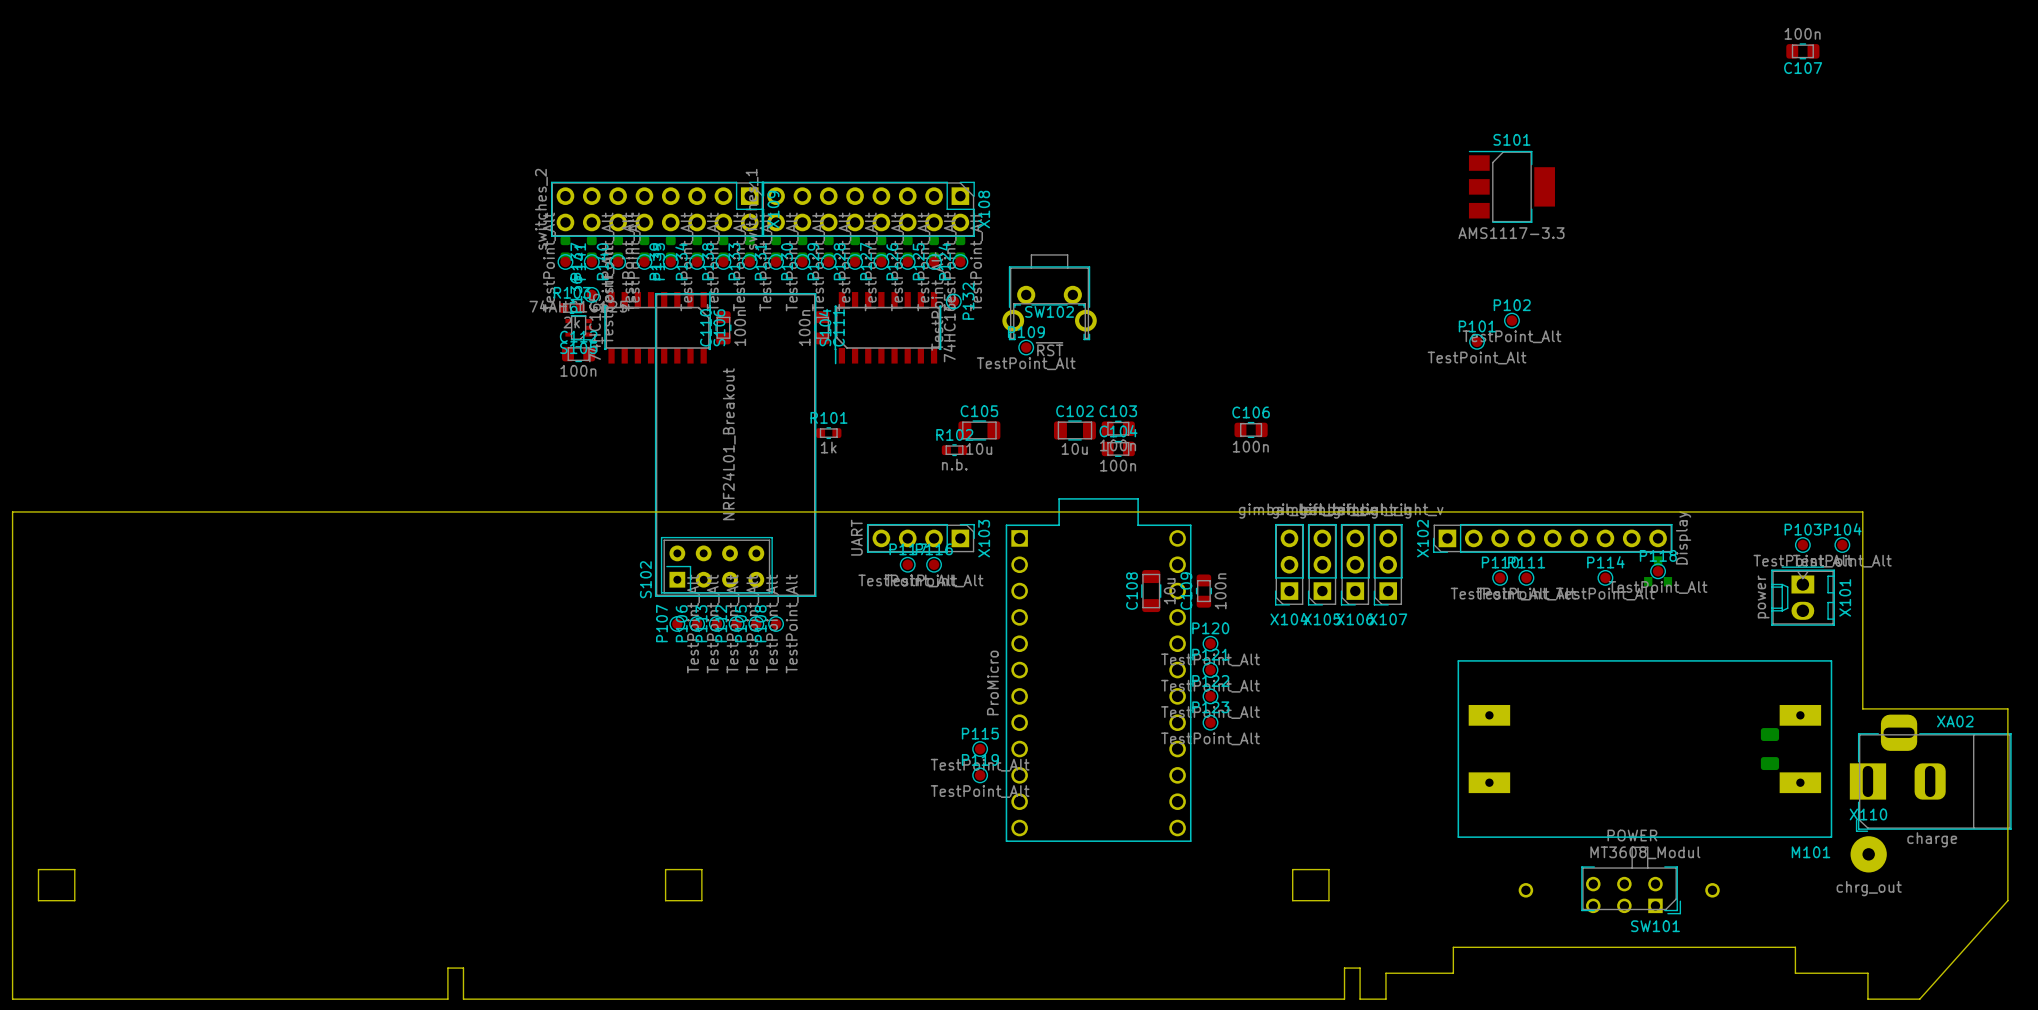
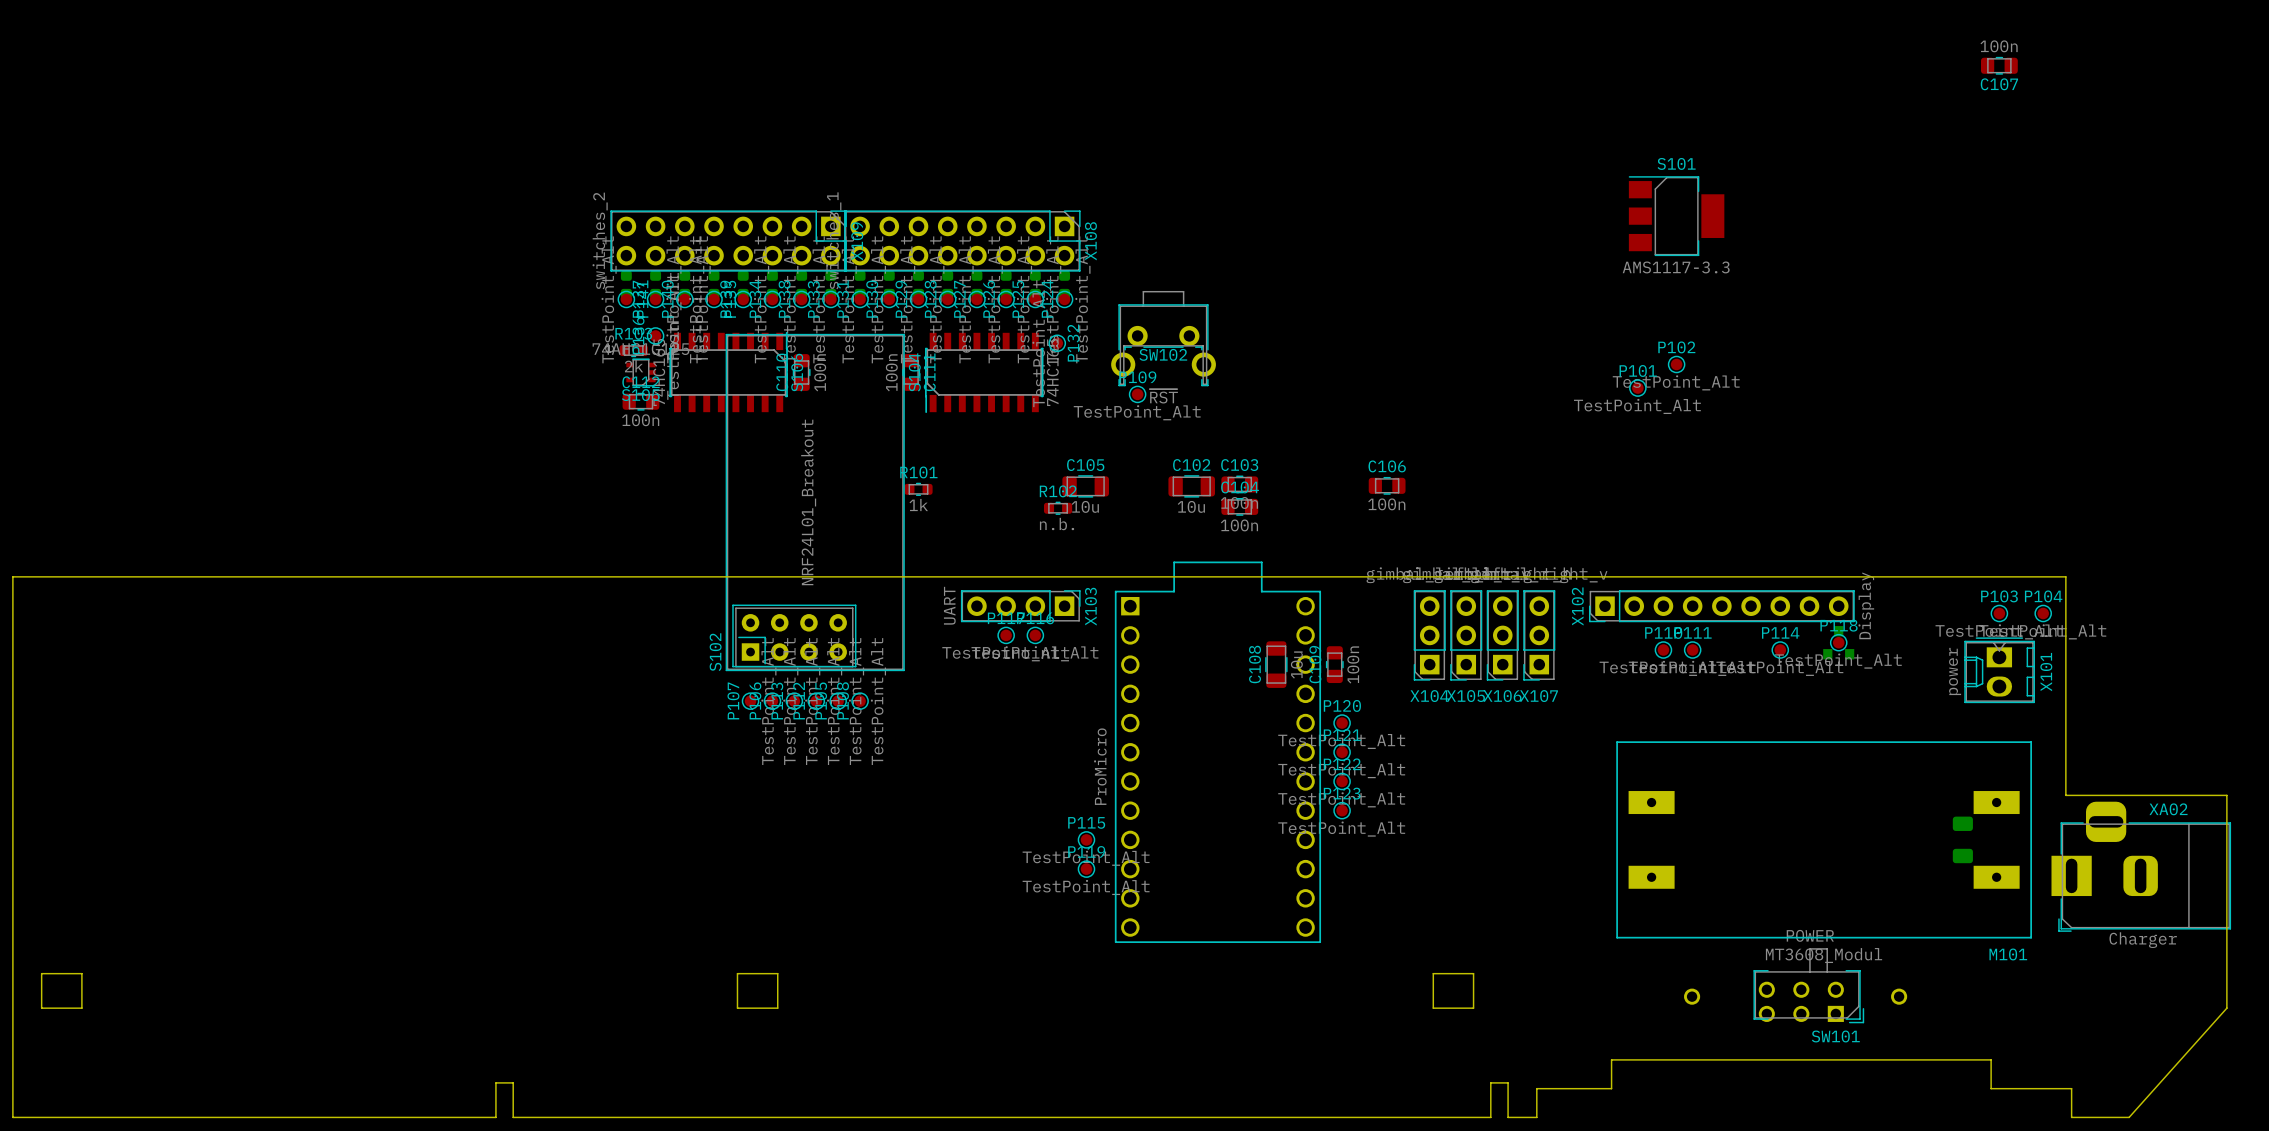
XA02 value: charge (1932, 839) -> Charger (2143, 940)
X110: chrg_out (1868, 854) -> none

